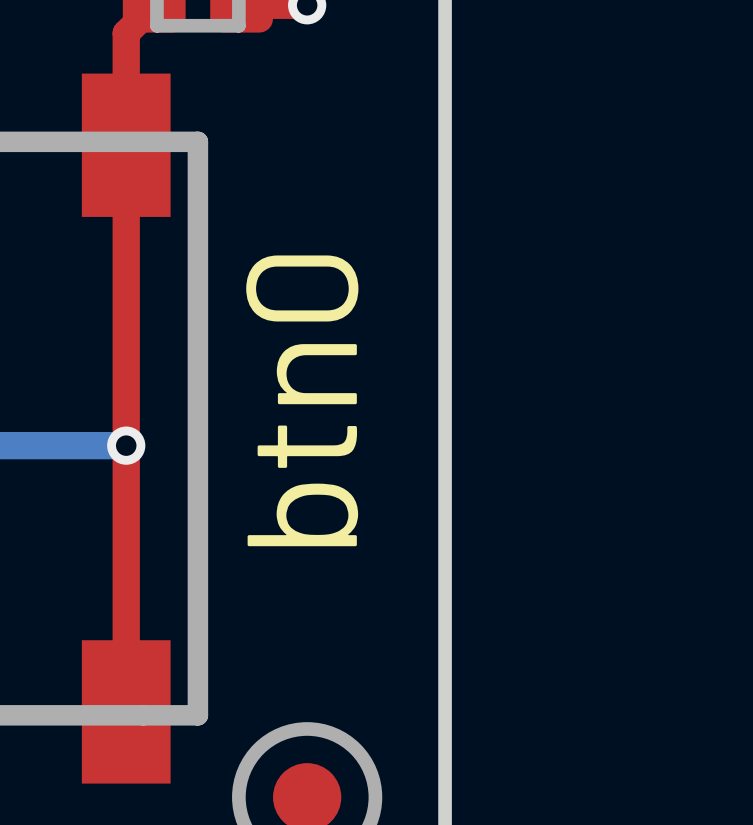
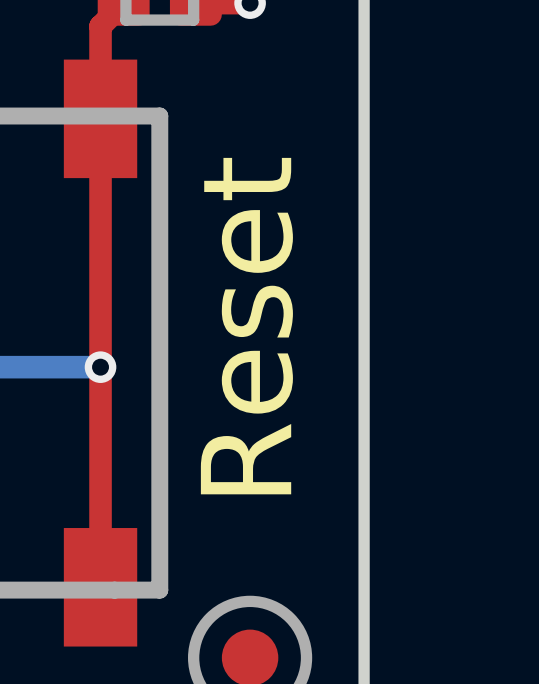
text: btn0 (302, 400) -> Reset (246, 326)

